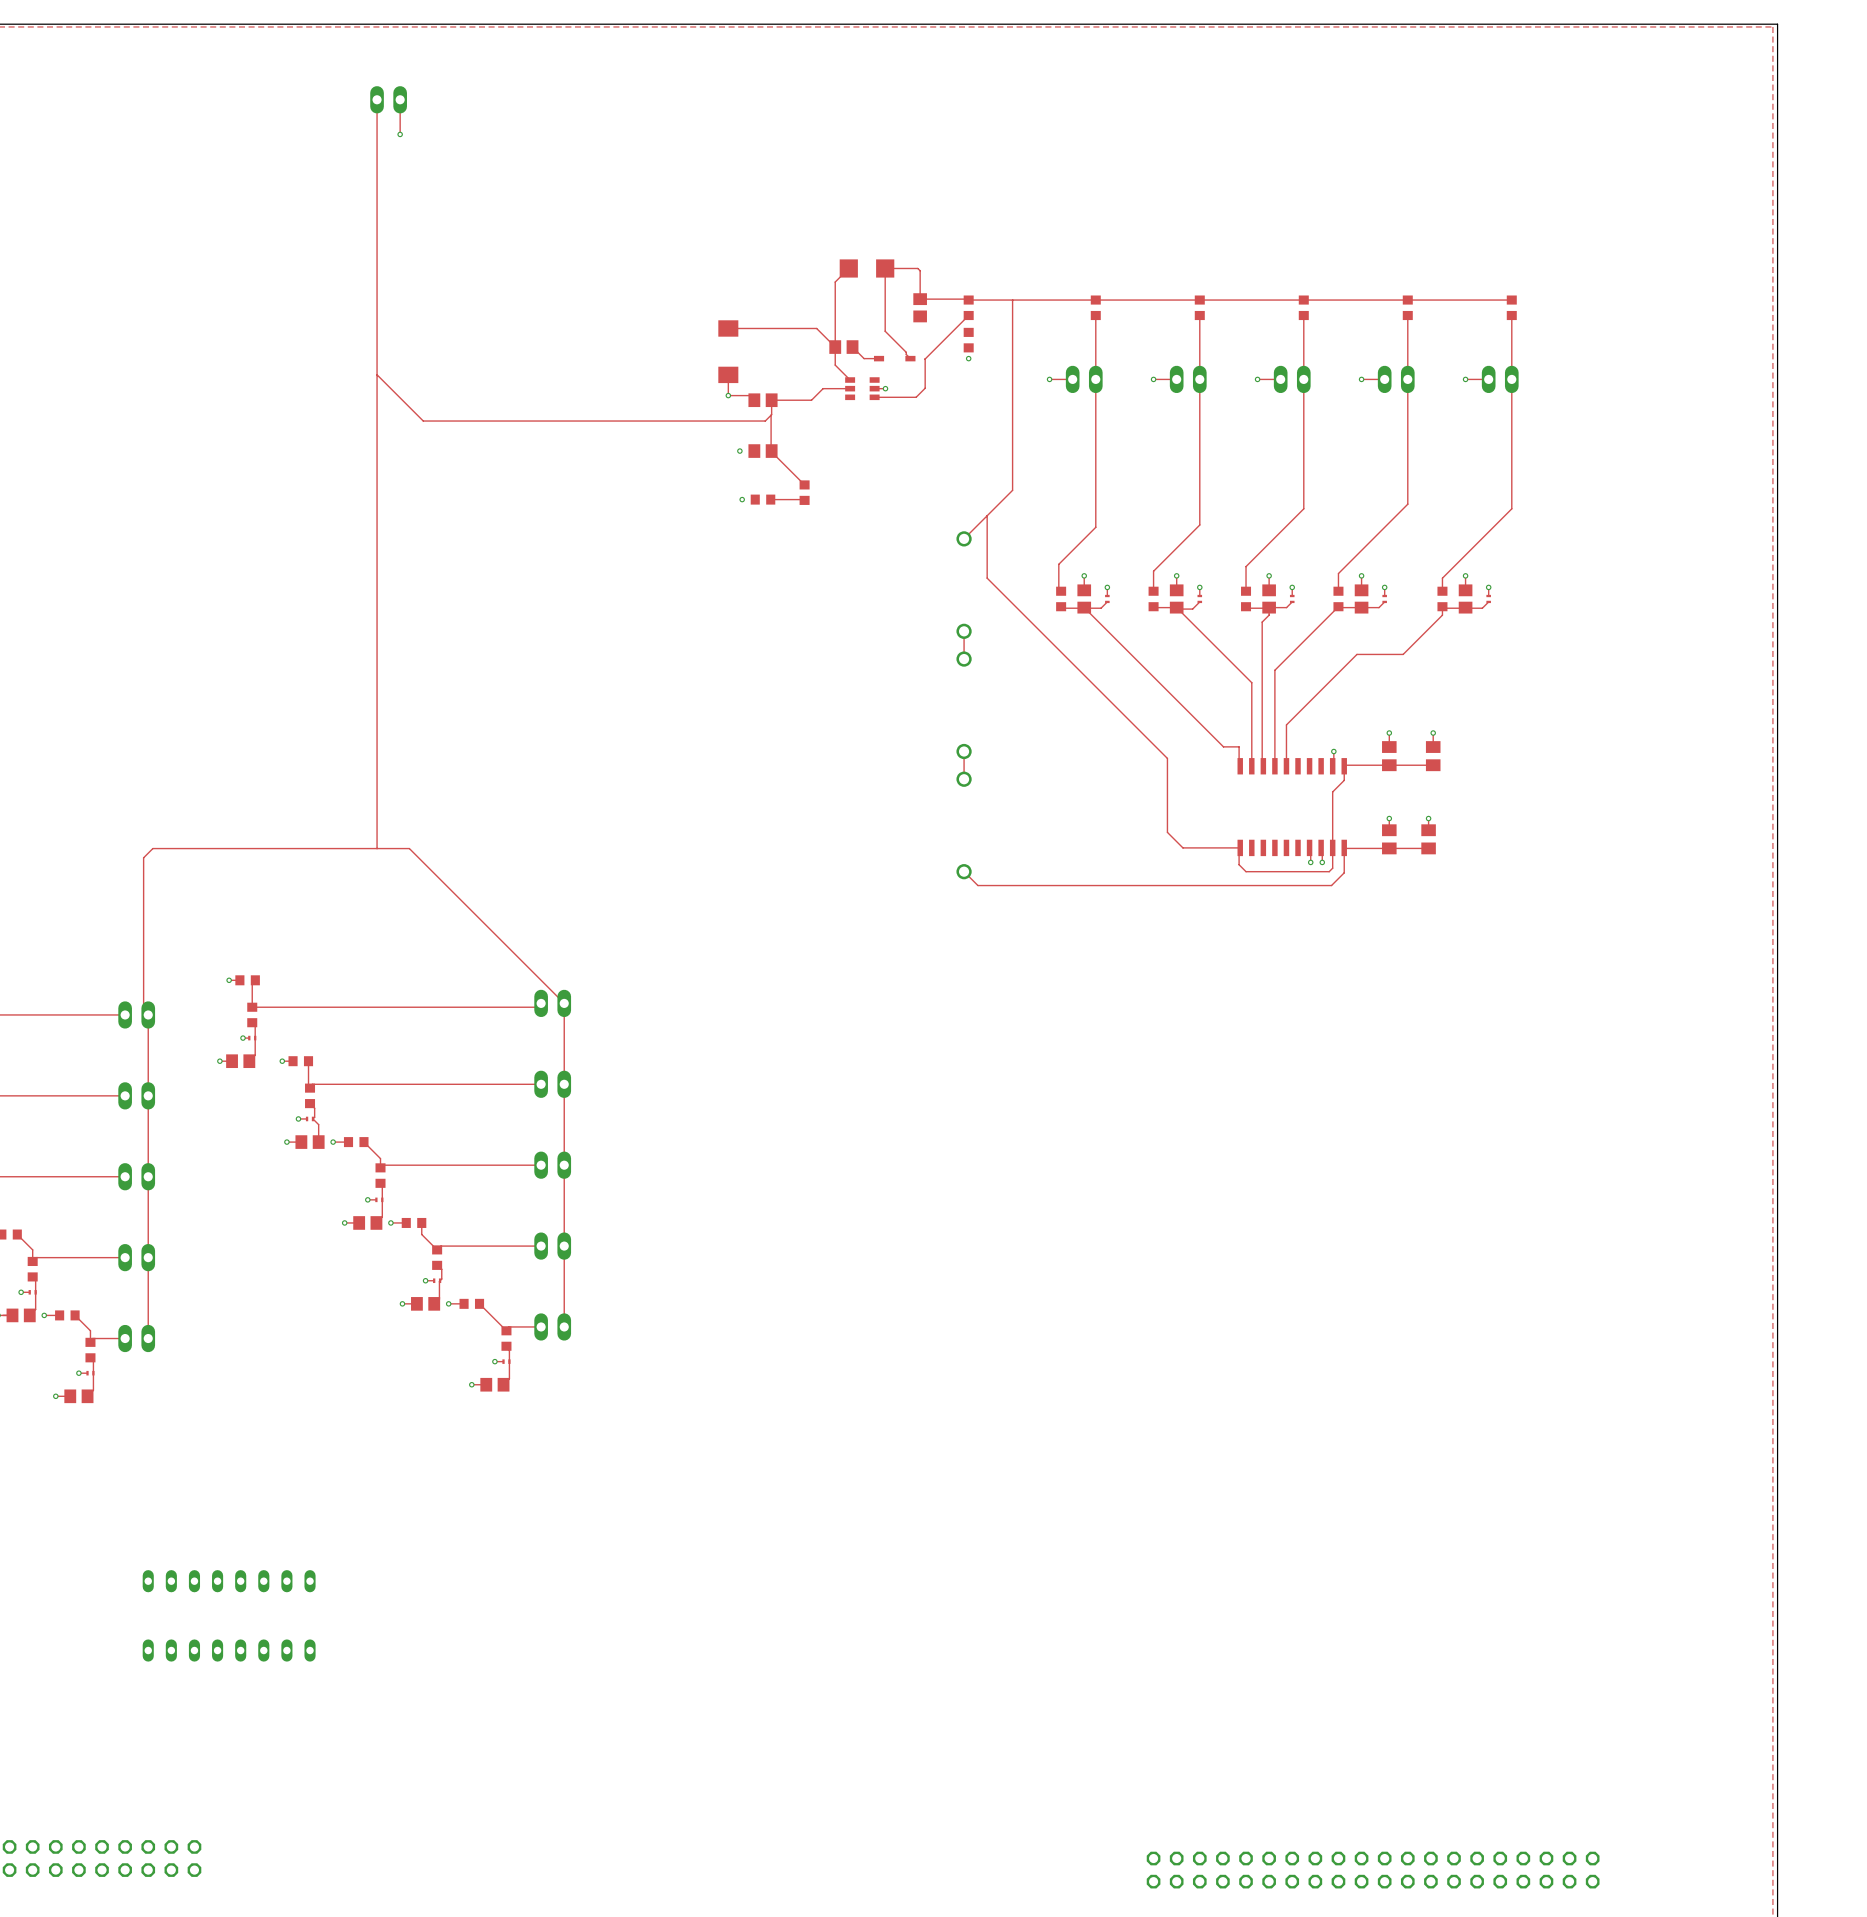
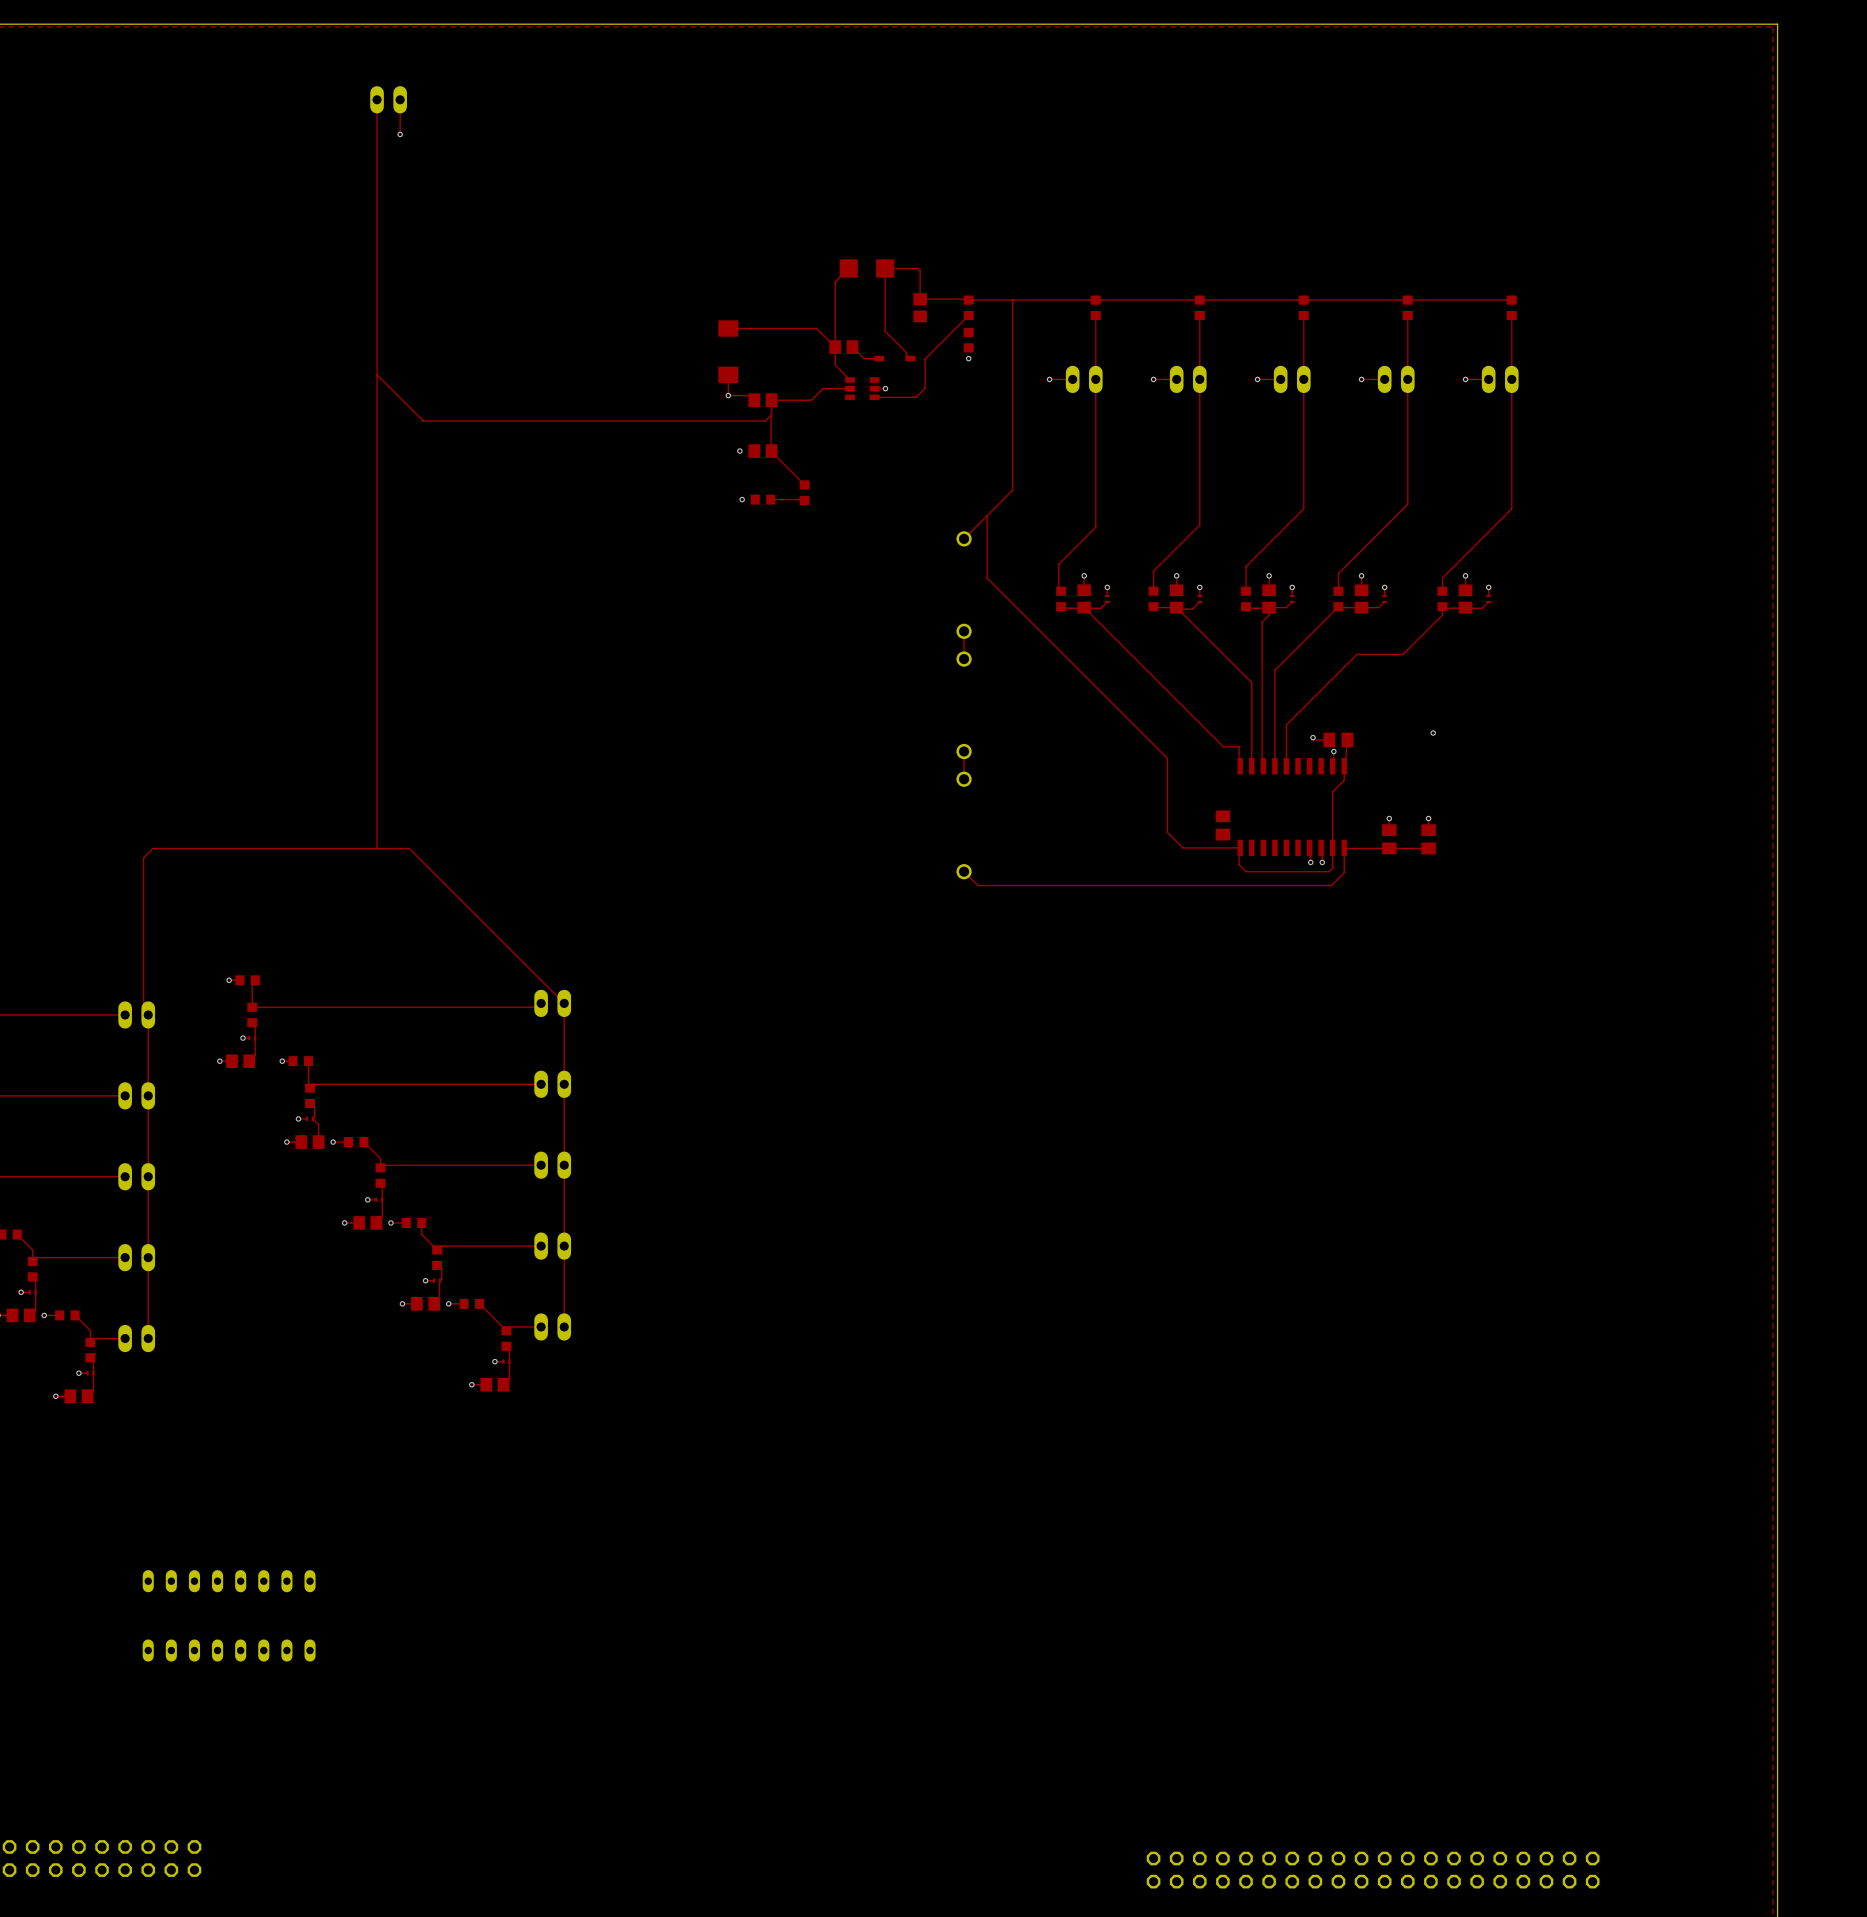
top track: (1389, 733) (1389, 747) -> none
via: (1389, 733) -> none
top track: (1433, 733) (1433, 747) -> none
top track: none -> (1313, 737) (1313, 739) (1329, 739)
via: none -> (1313, 737)
part: none -> (1338, 739)
part: (1389, 756) -> none
part: (1433, 756) -> none
top track: (1433, 765) (1345, 765) -> (1347, 739) (1345, 765)
part: none -> (1222, 825)

